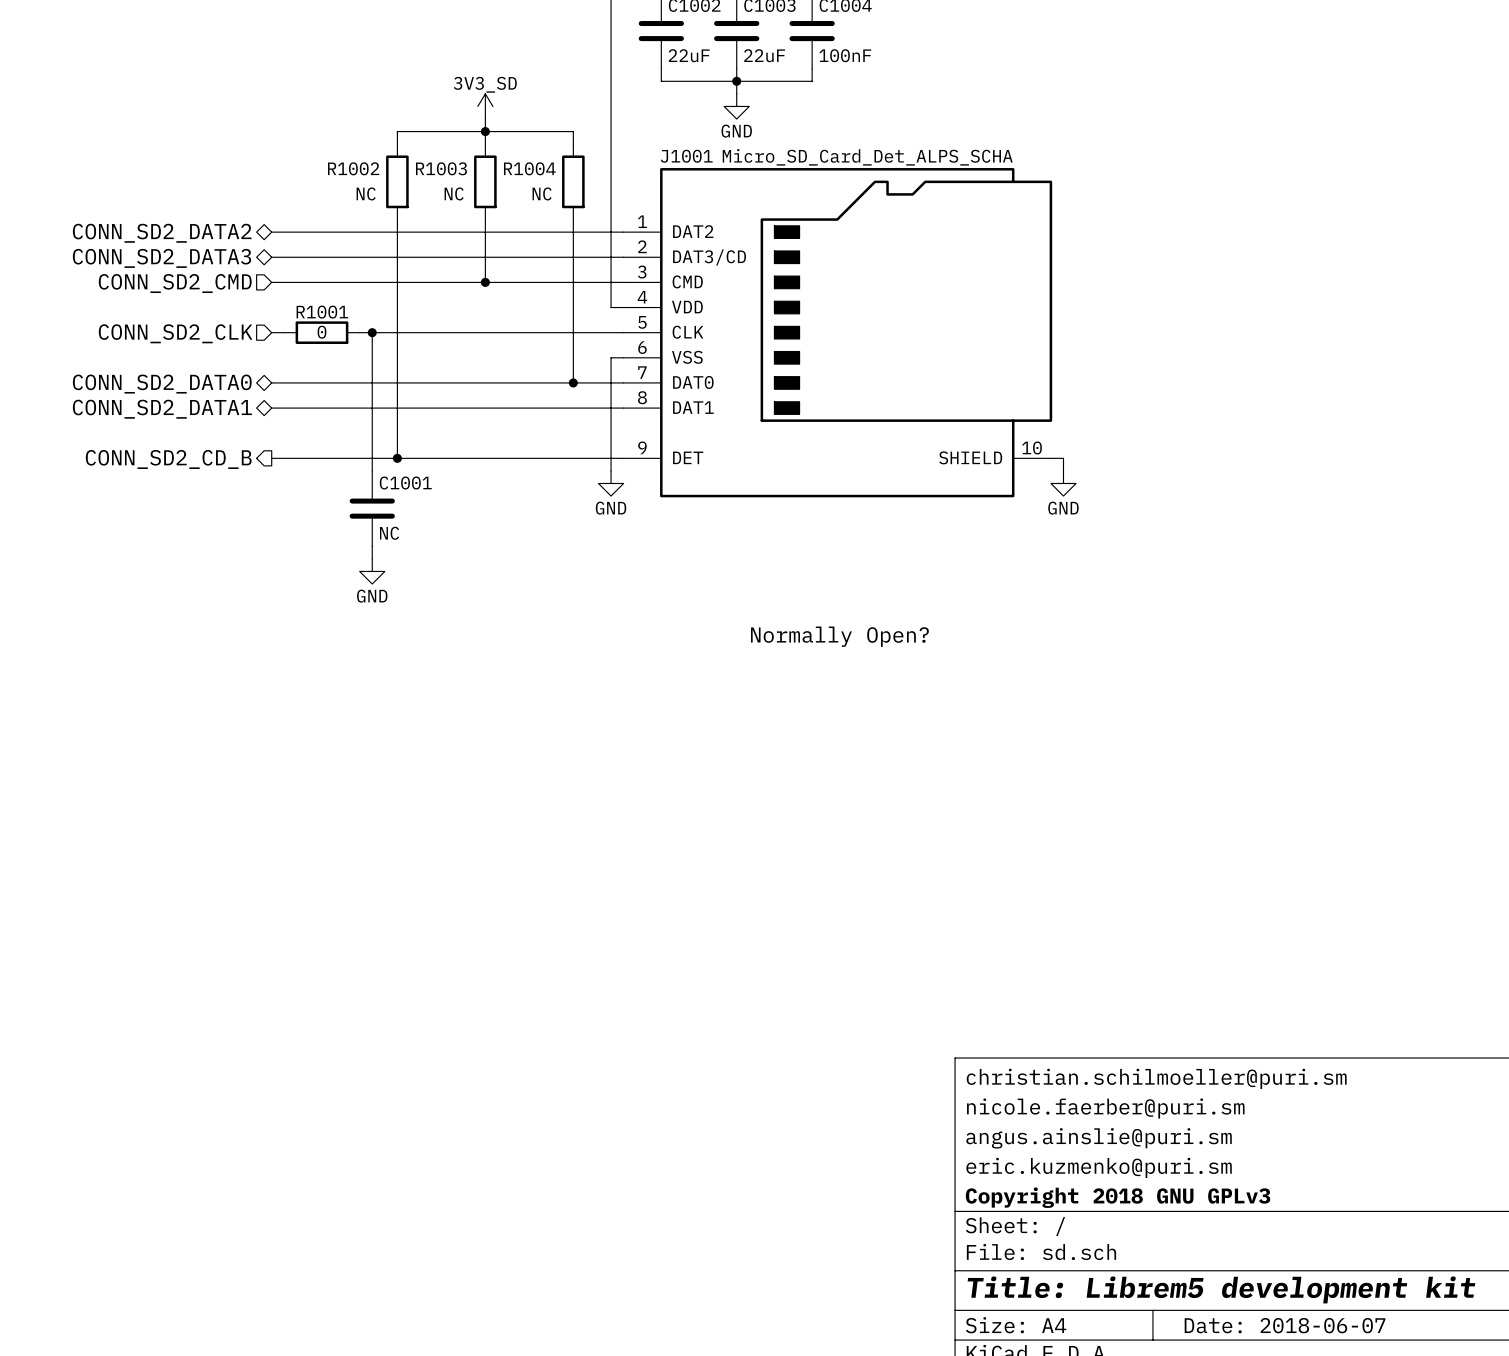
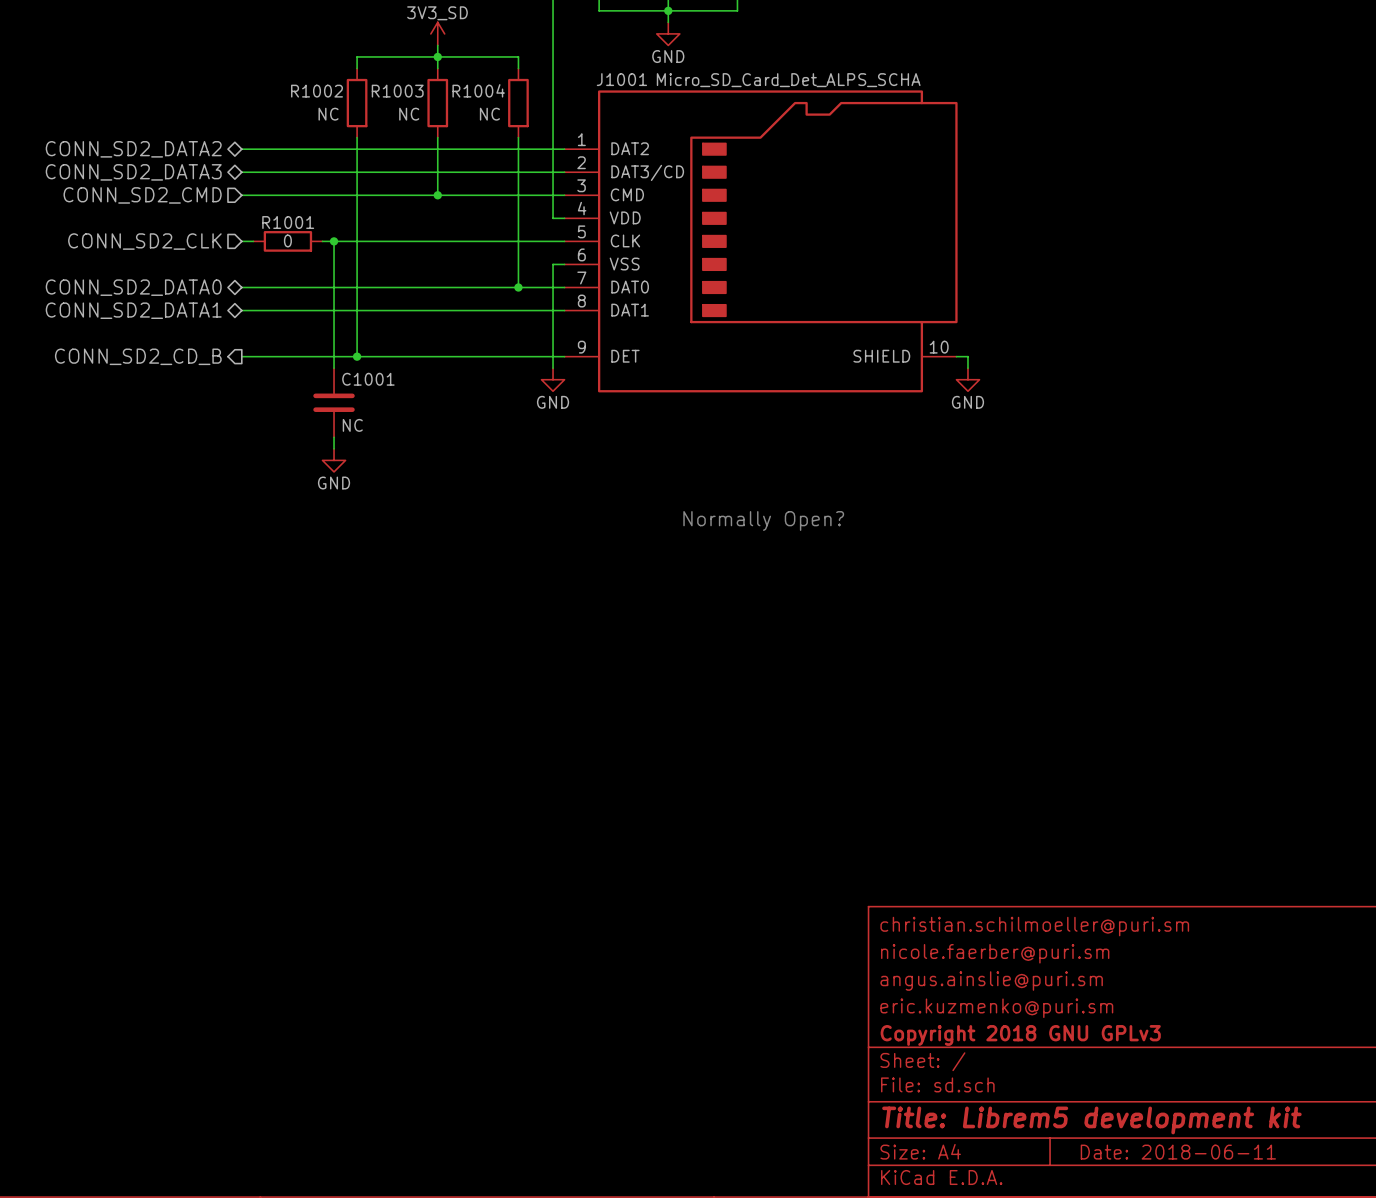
title block: Date: 2018-06-07 (1285, 1325) -> Date: 2018-06-11 (1178, 1152)

